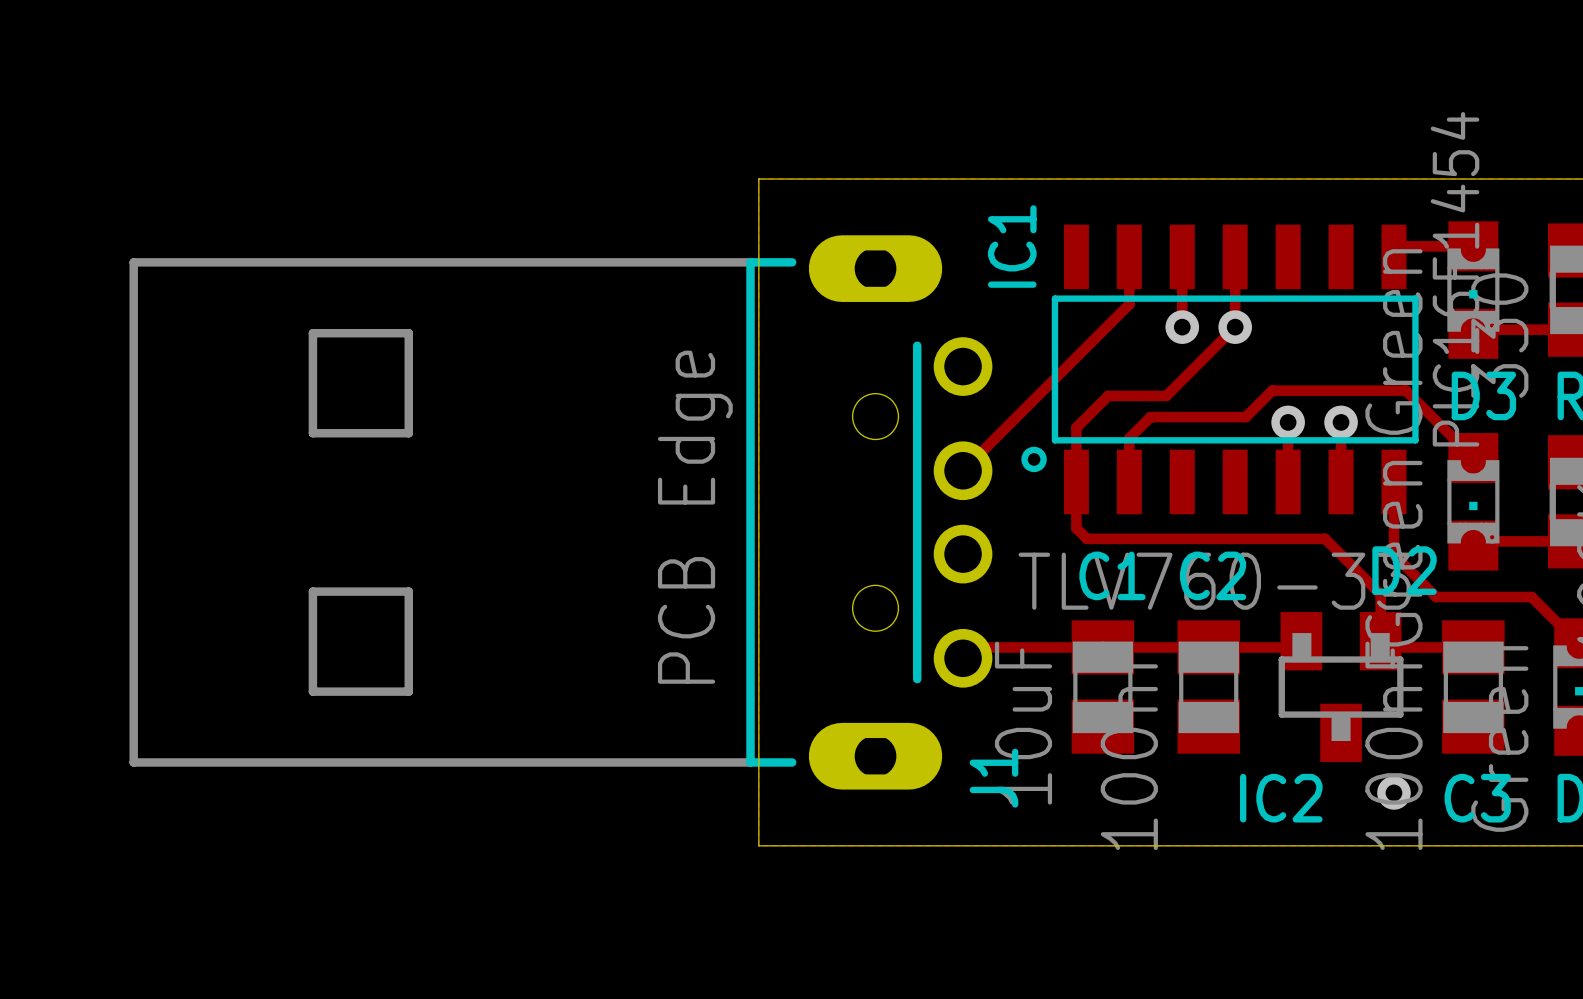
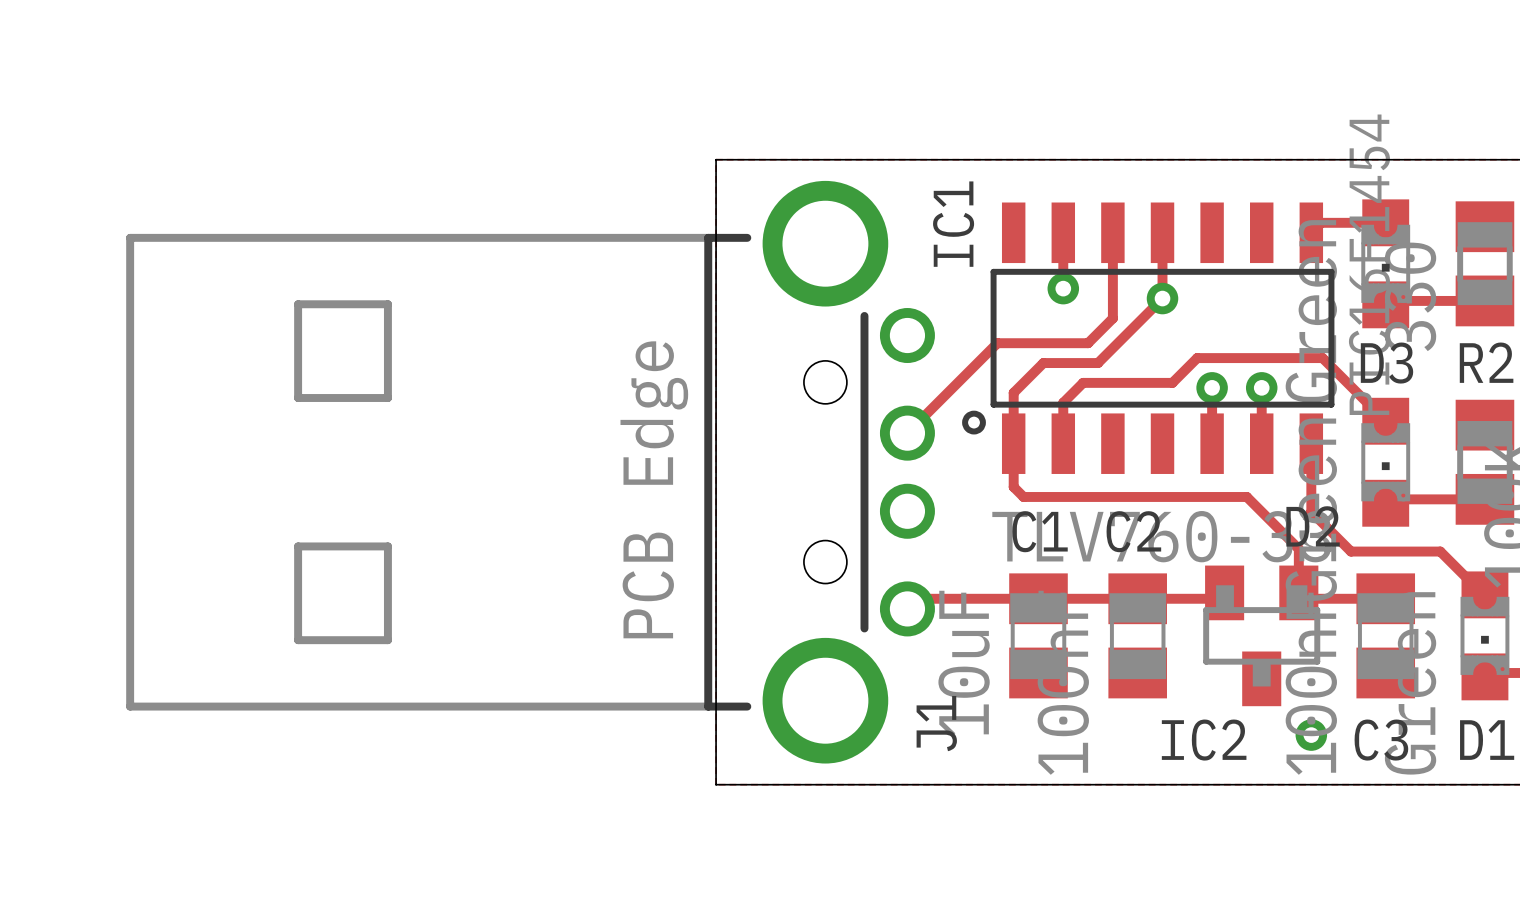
J1 footprint: [129, 235, 993, 790] -> [126, 180, 935, 764]
track: (1129, 304) (1059, 374) -> (1112, 298) (1112, 318) (1088, 343) (997, 343)
via position: (1182, 327) -> (1063, 288)

